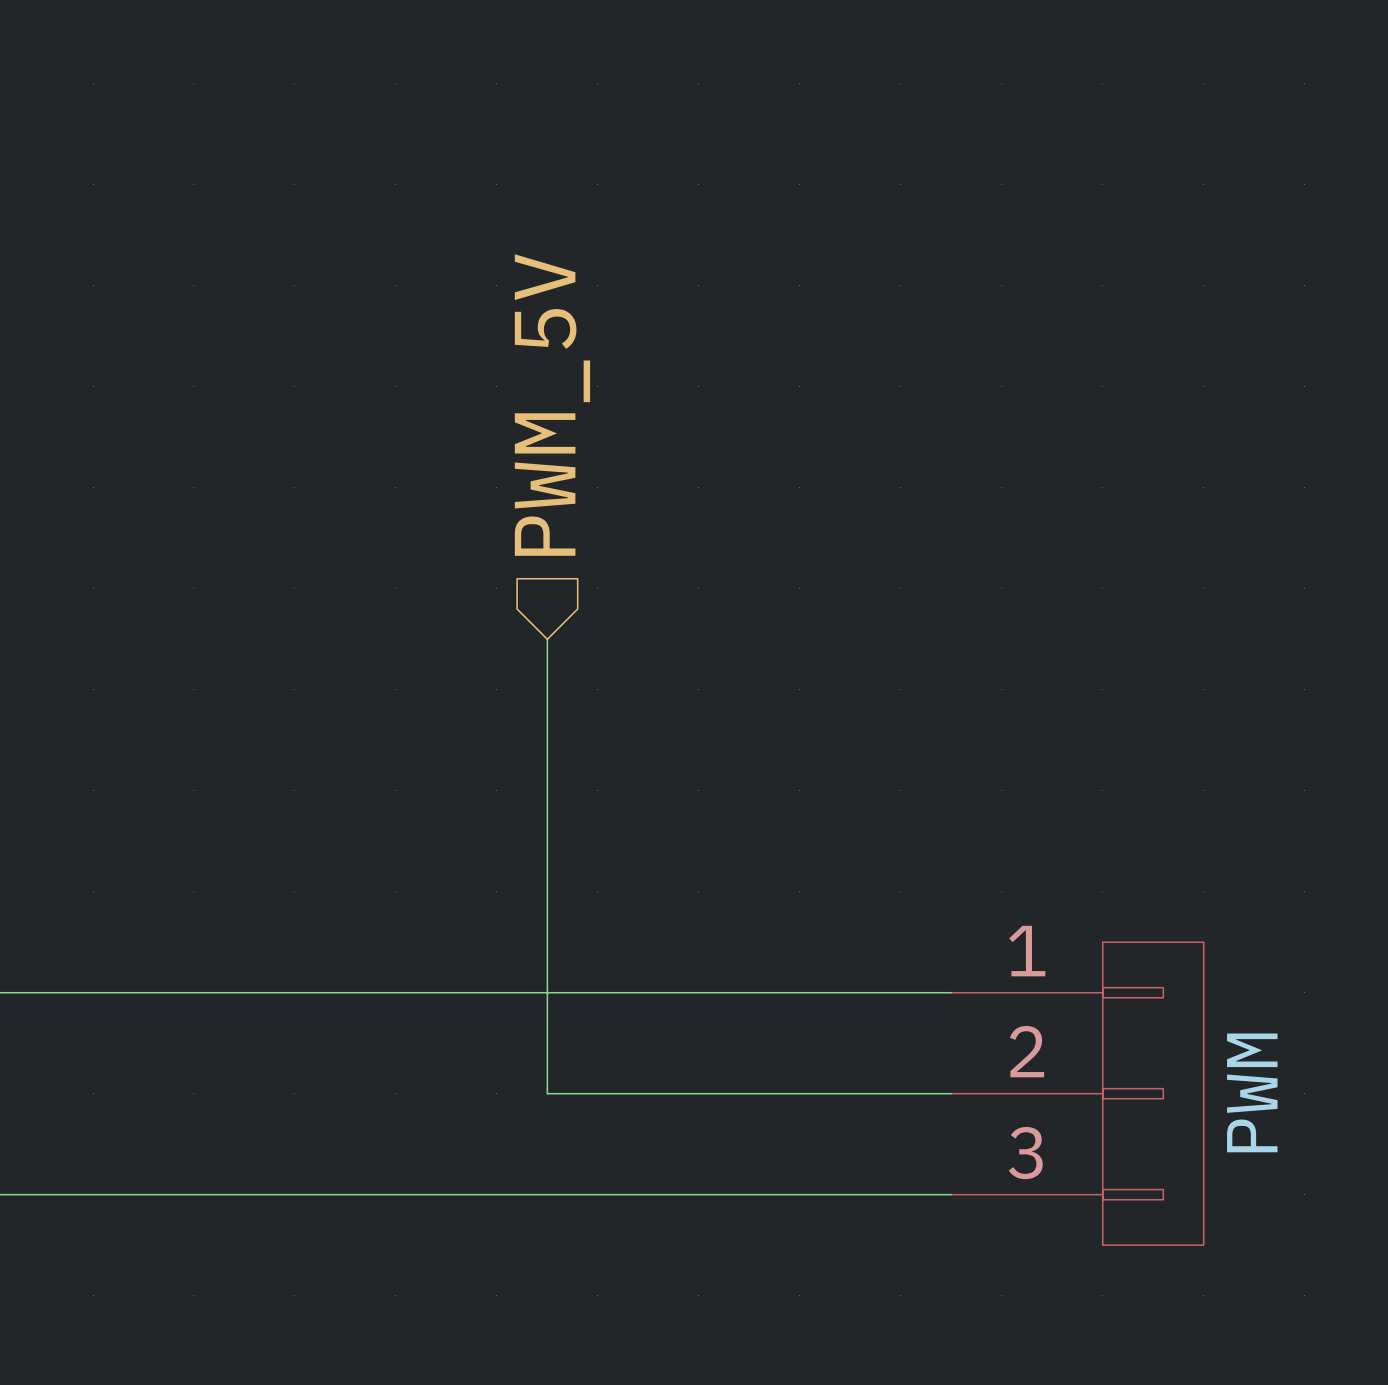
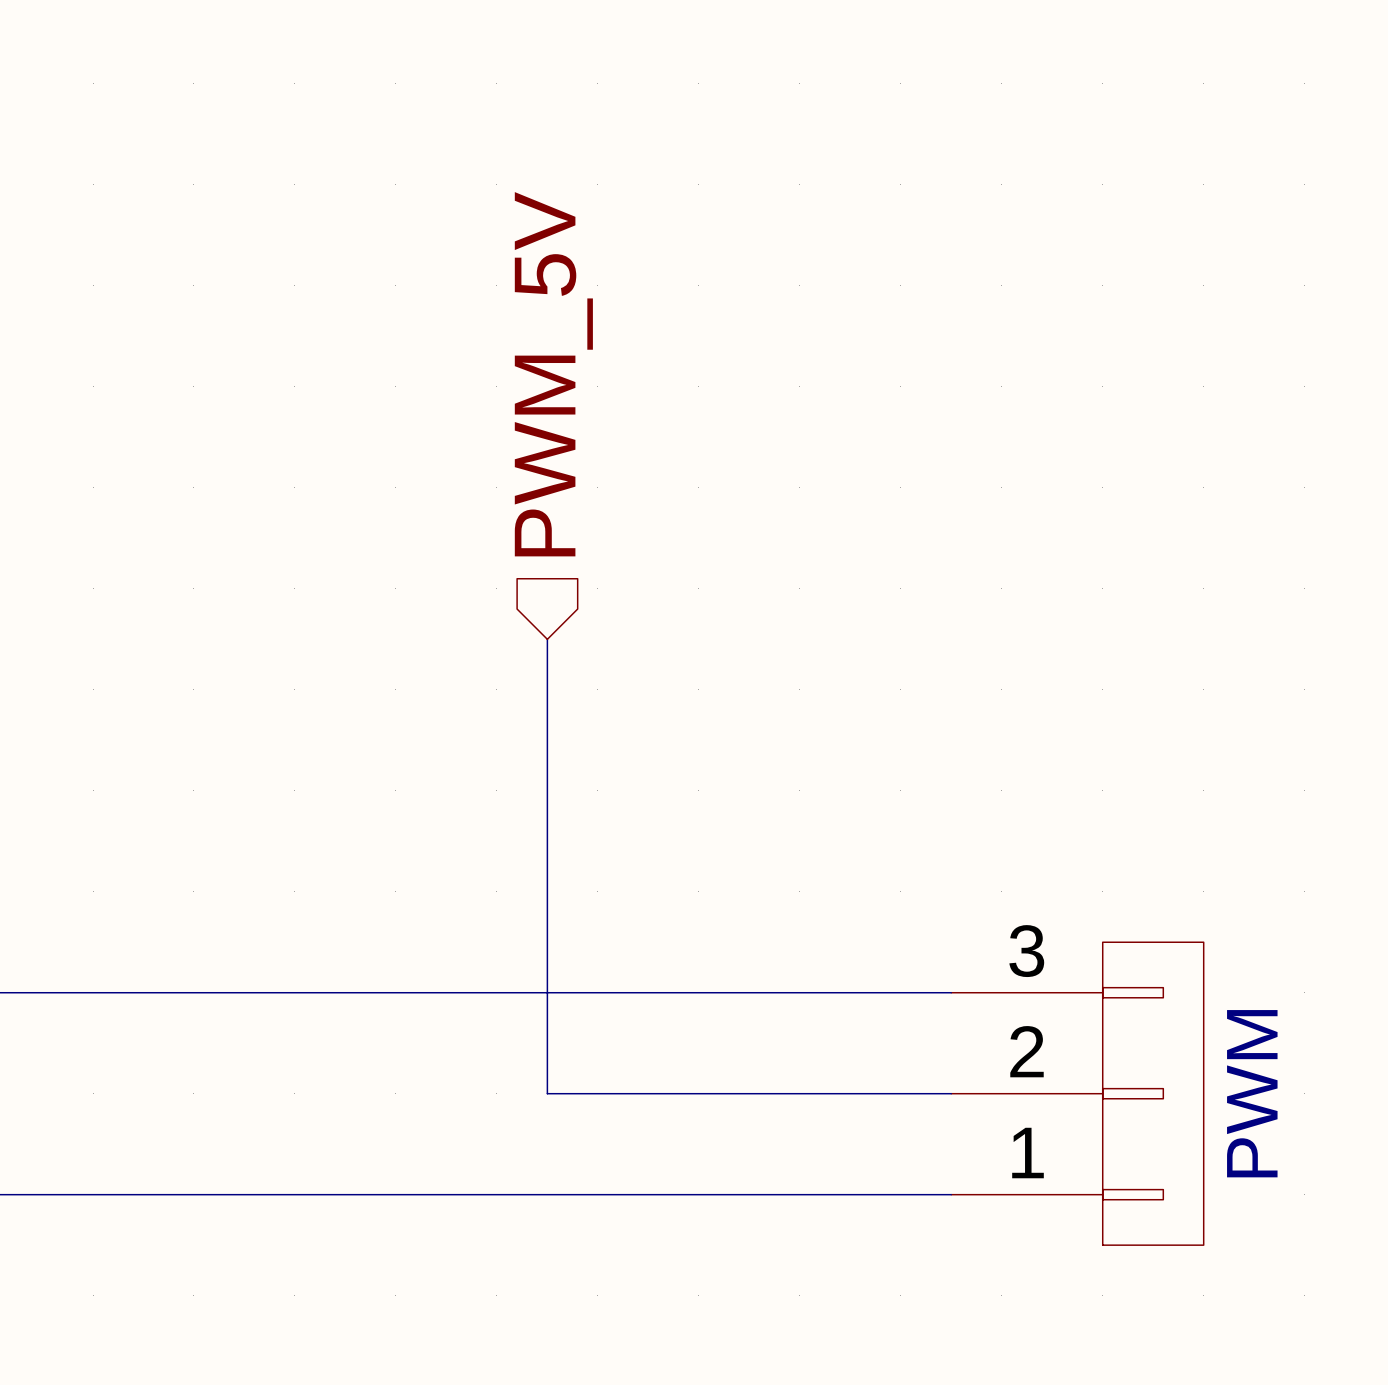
part flip: as is (1153, 1093) -> up-down (1153, 1093)

